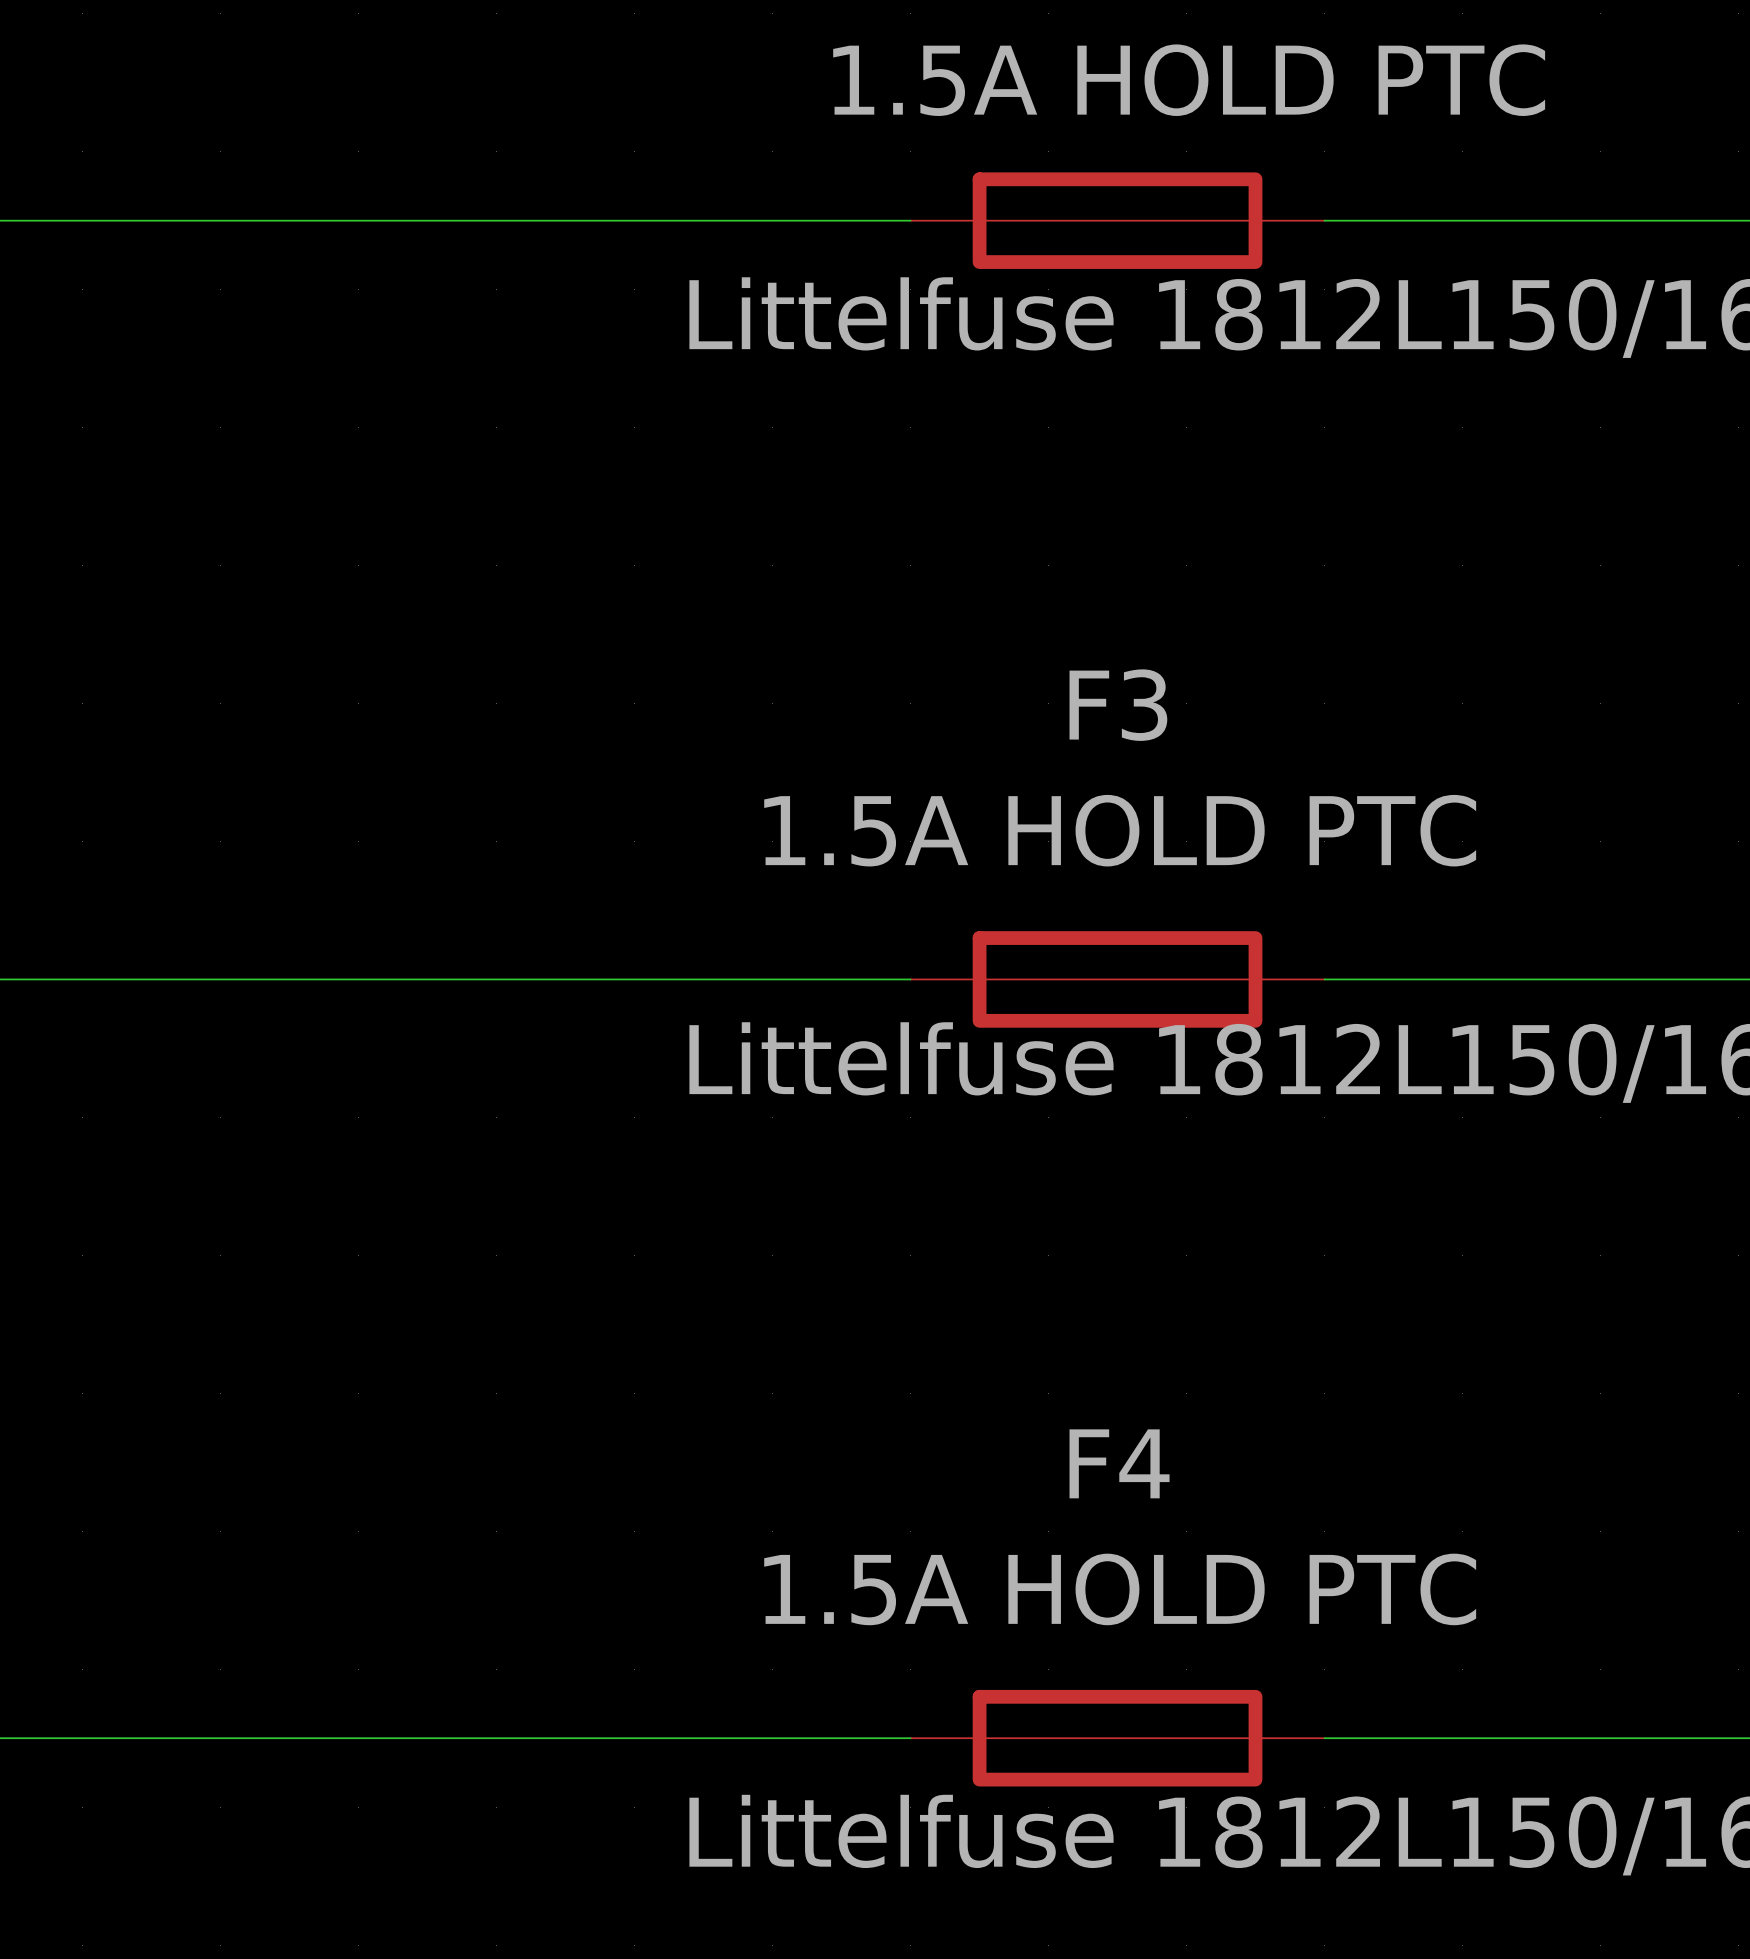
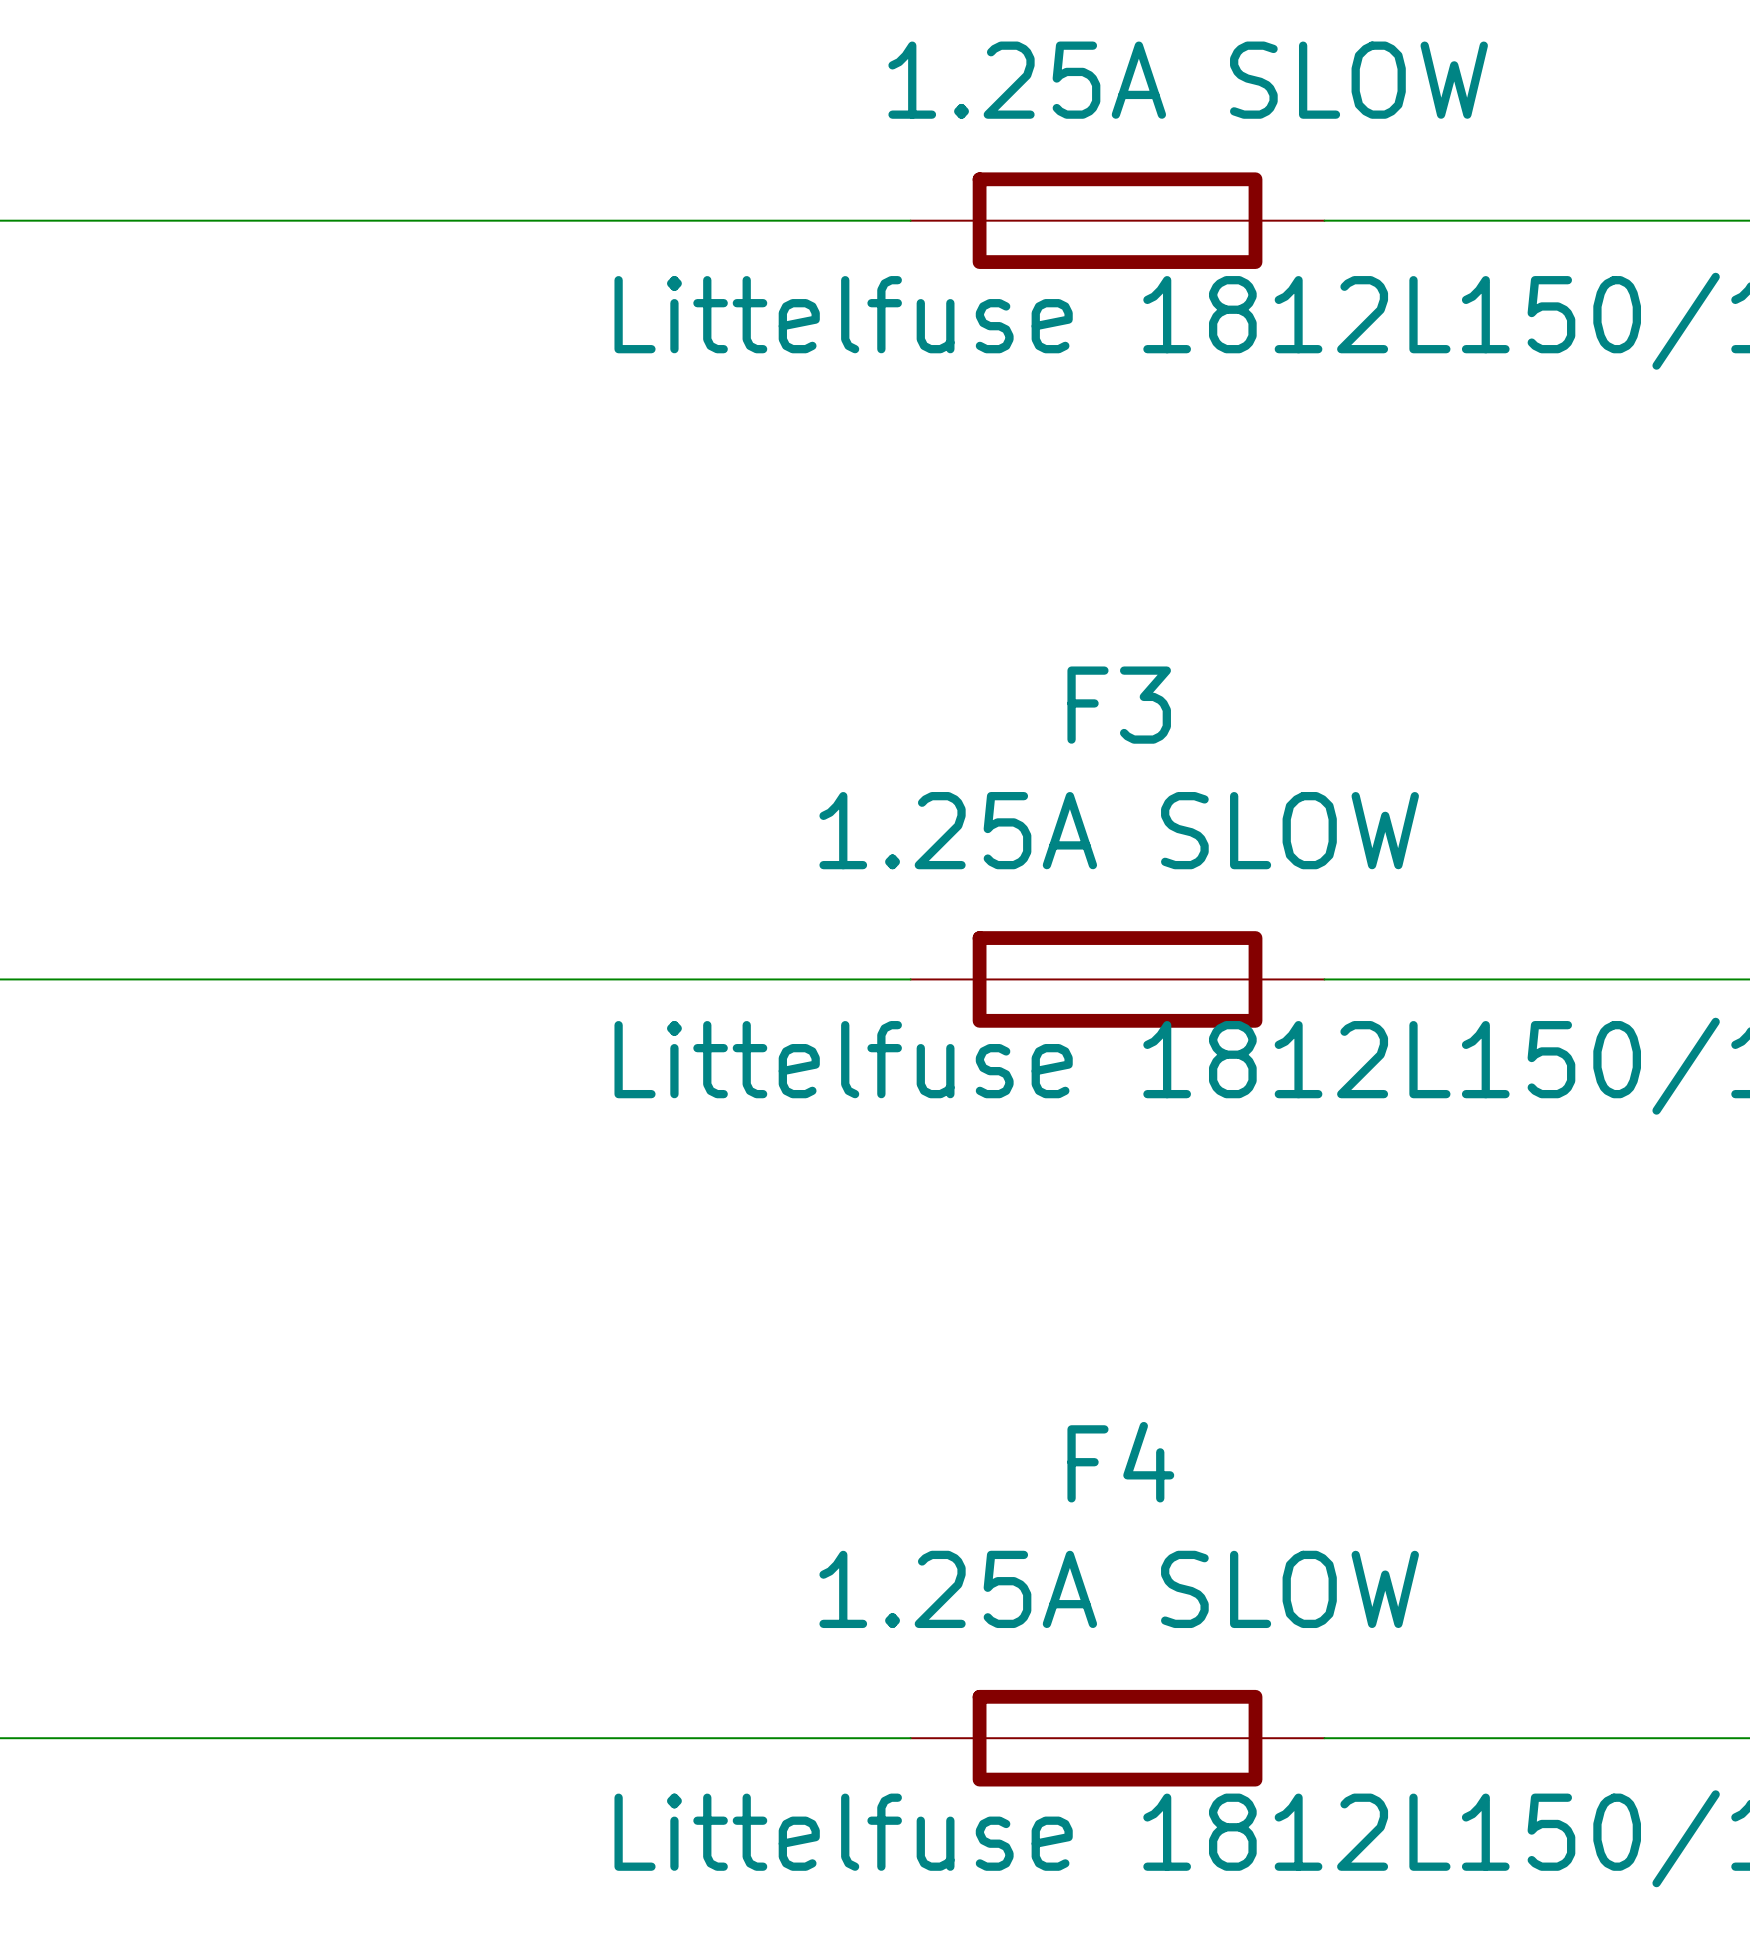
part value: 1.5A HOLD PTC (1189, 80) -> 1.25A SLOW (1188, 80)
F3 value: 1.5A HOLD PTC (1120, 830) -> 1.25A SLOW (1119, 830)
F4 value: 1.5A HOLD PTC (1120, 1589) -> 1.25A SLOW (1119, 1589)

